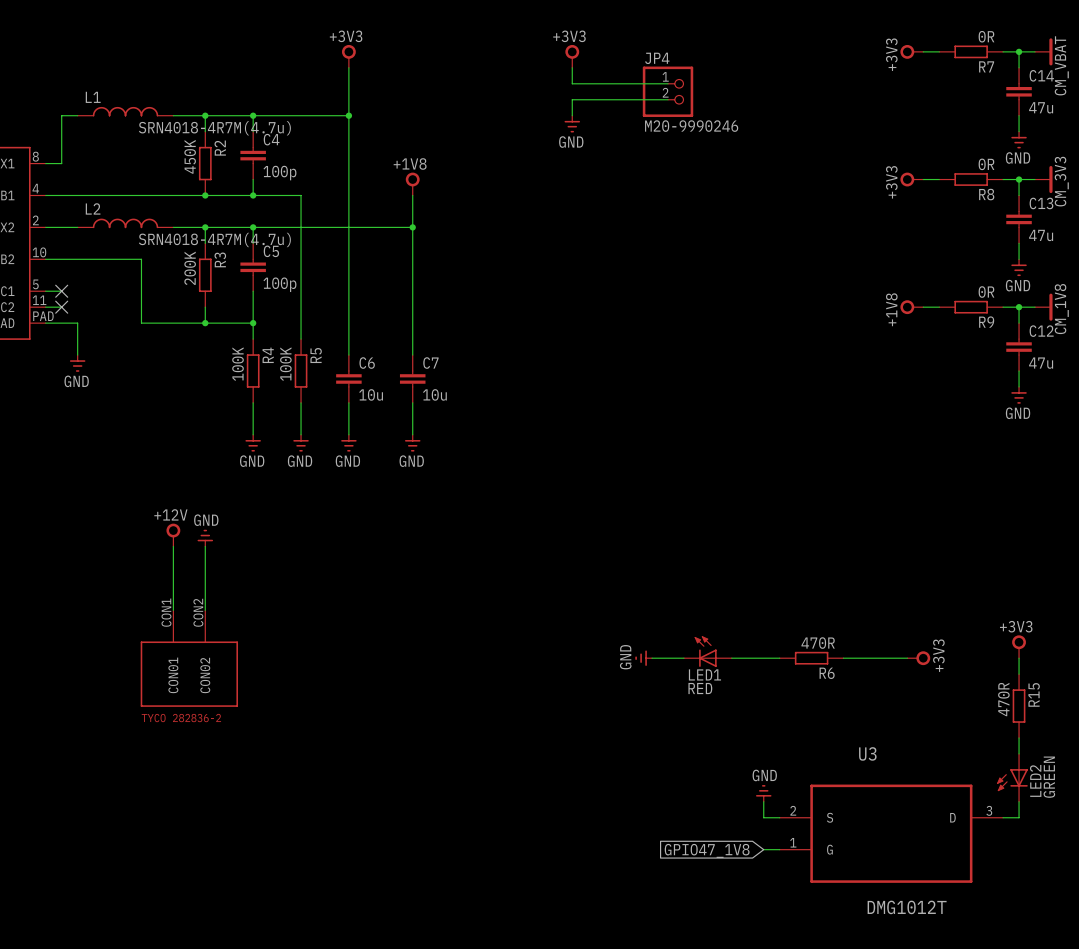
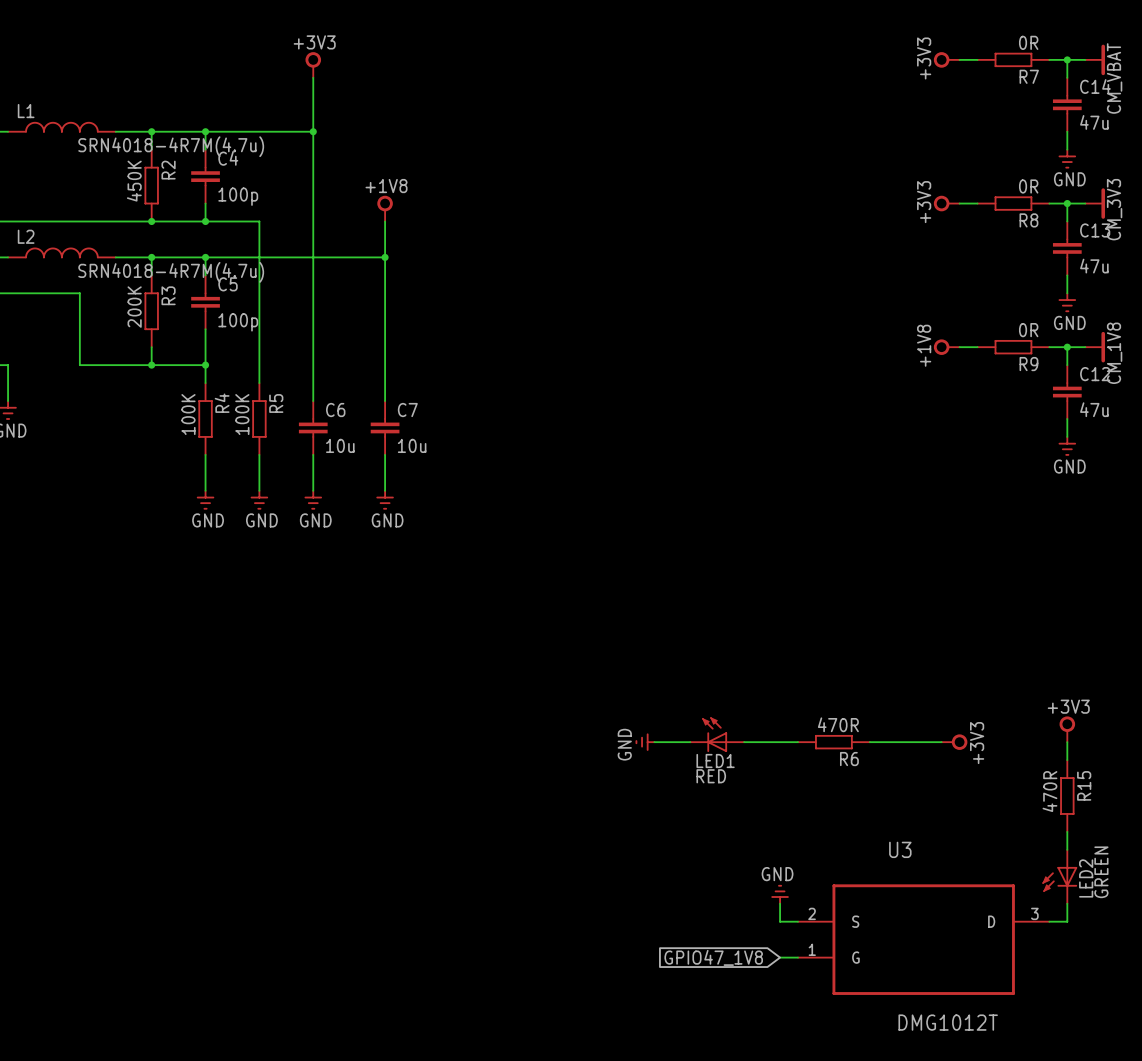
power symbol: +3V3 (572, 56) -> none
wire: (572, 67) (572, 83) (668, 83) -> none
JP4: M20-9990246 (668, 91) -> none
wire: (668, 99) (572, 99) (572, 115) -> none
power symbol: GND (572, 123) -> none
power symbol: +12V (173, 535) -> none
power symbol: GND (205, 538) -> none
wire: (173, 546) (173, 610) -> none
wire: (205, 546) (205, 610) -> none
part: (189, 658) -> none

